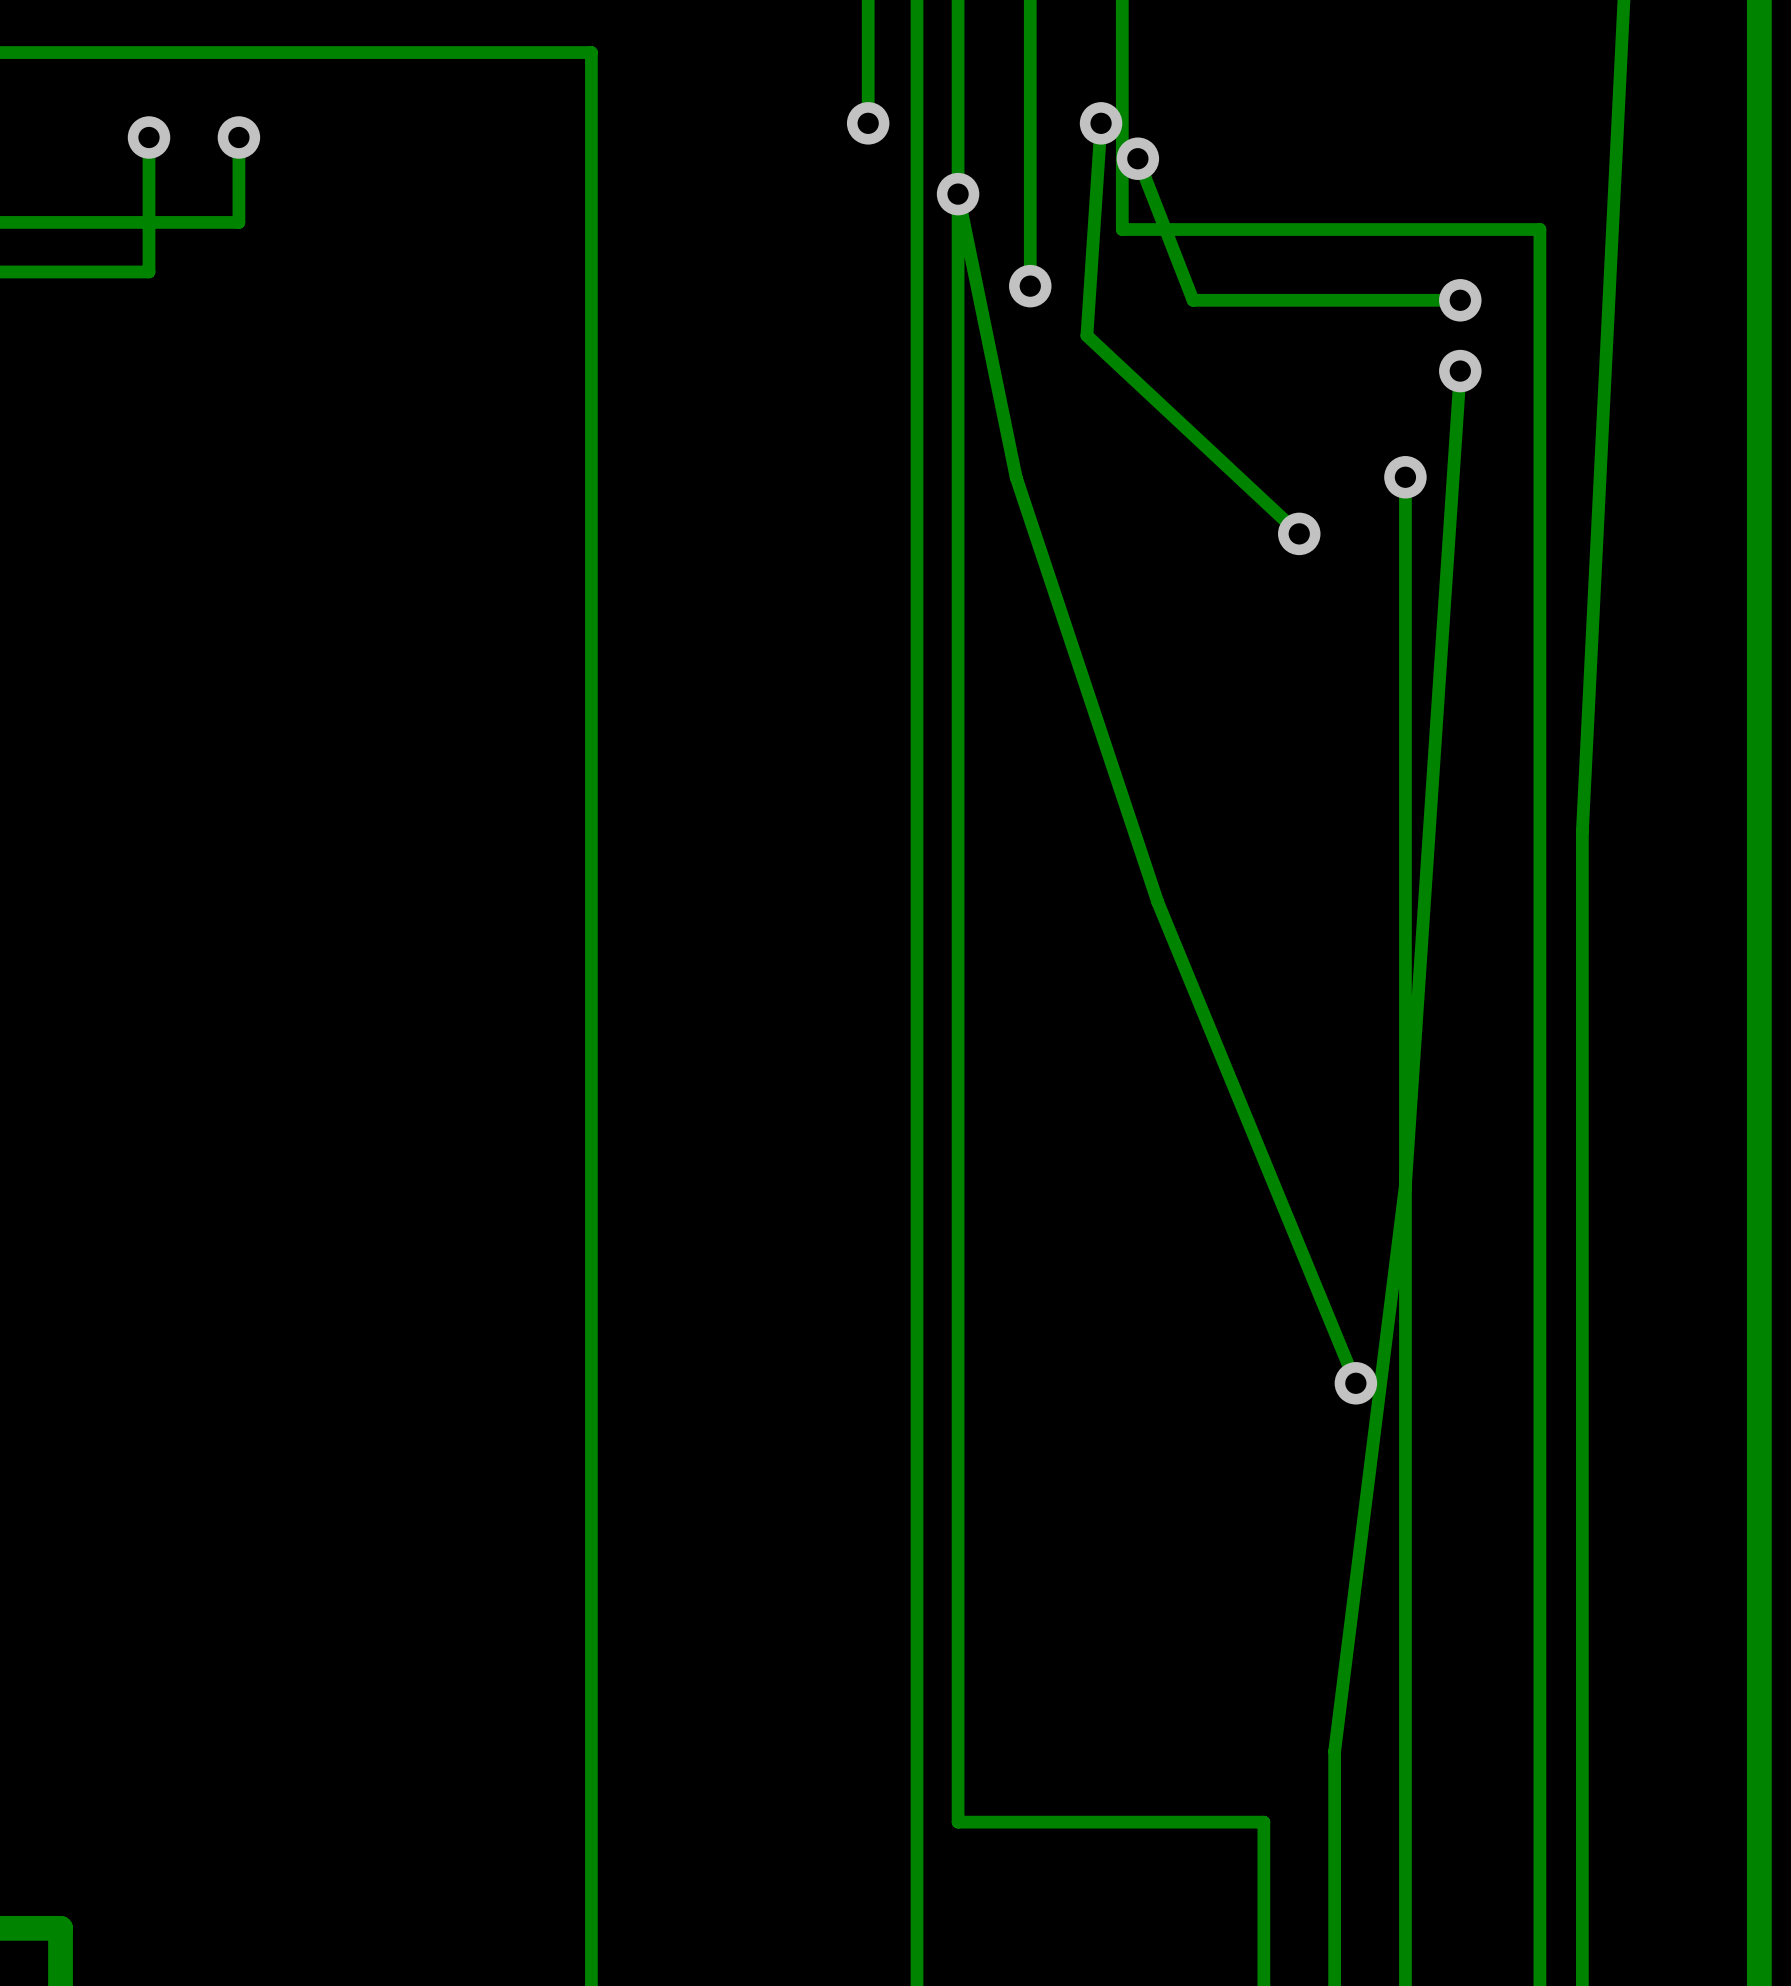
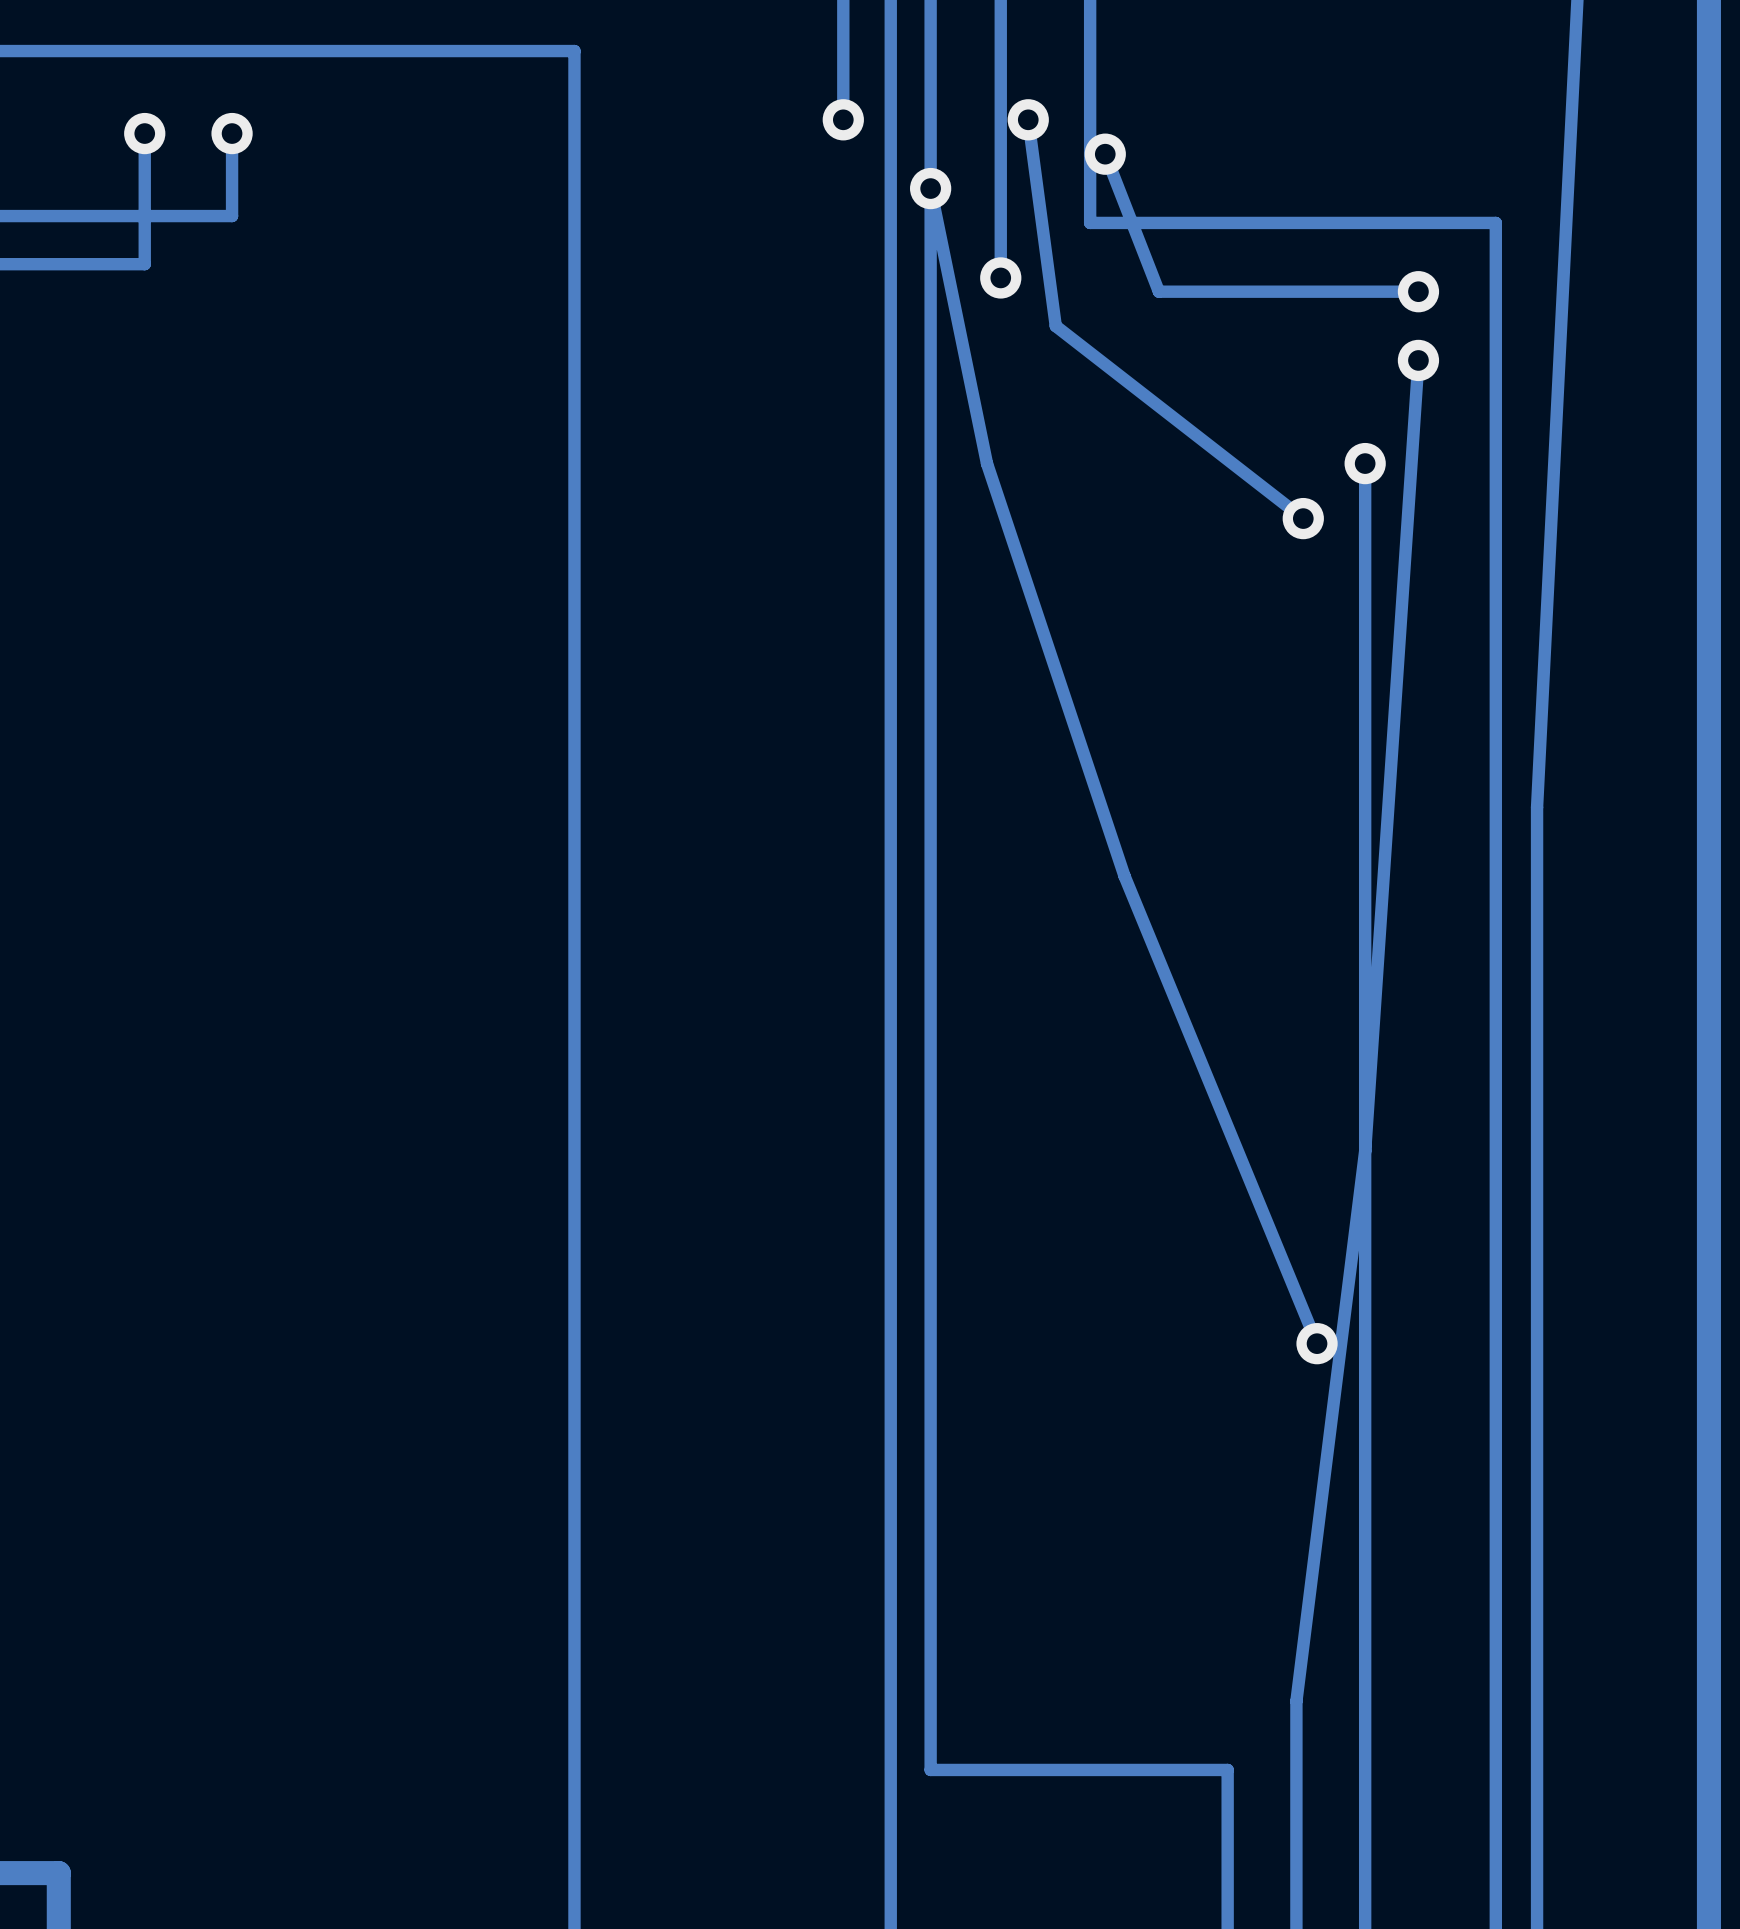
track: none -> (1028, 119) (1055, 326) (1303, 518)
track: (1101, 123) (1086, 335) (1299, 533) -> none
via position: (1101, 123) -> (1028, 119)
via position: (1299, 533) -> (1303, 518)

